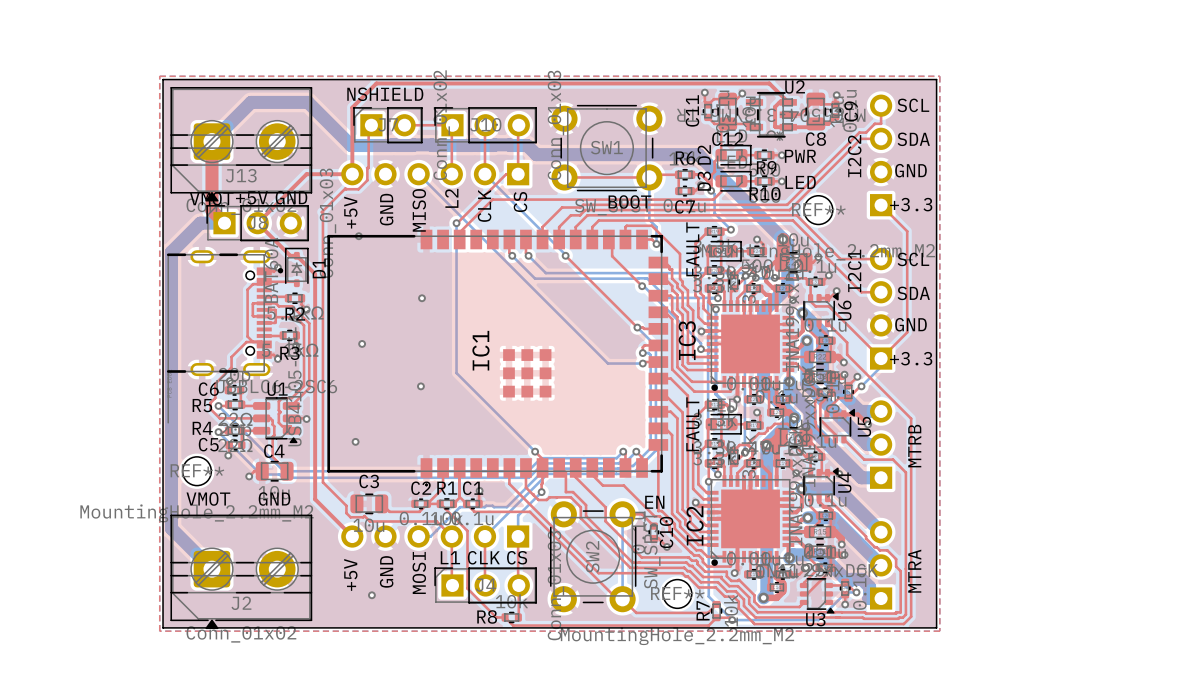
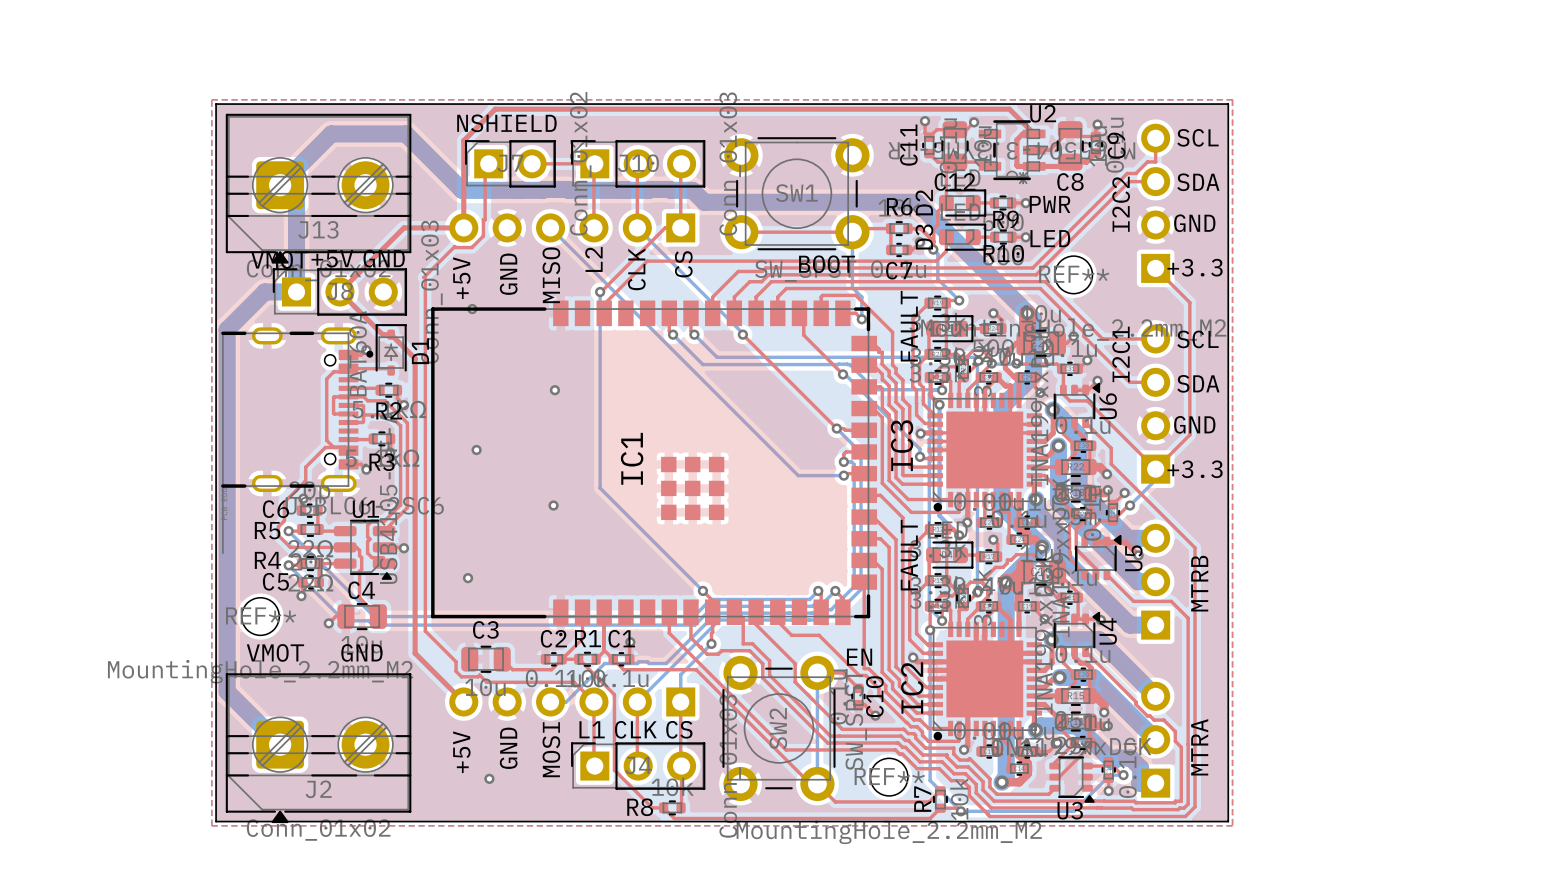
top track: (211, 141) (211, 210) (224, 223) -> none
bottom track: none -> (280, 185) (296, 201) (296, 291)

